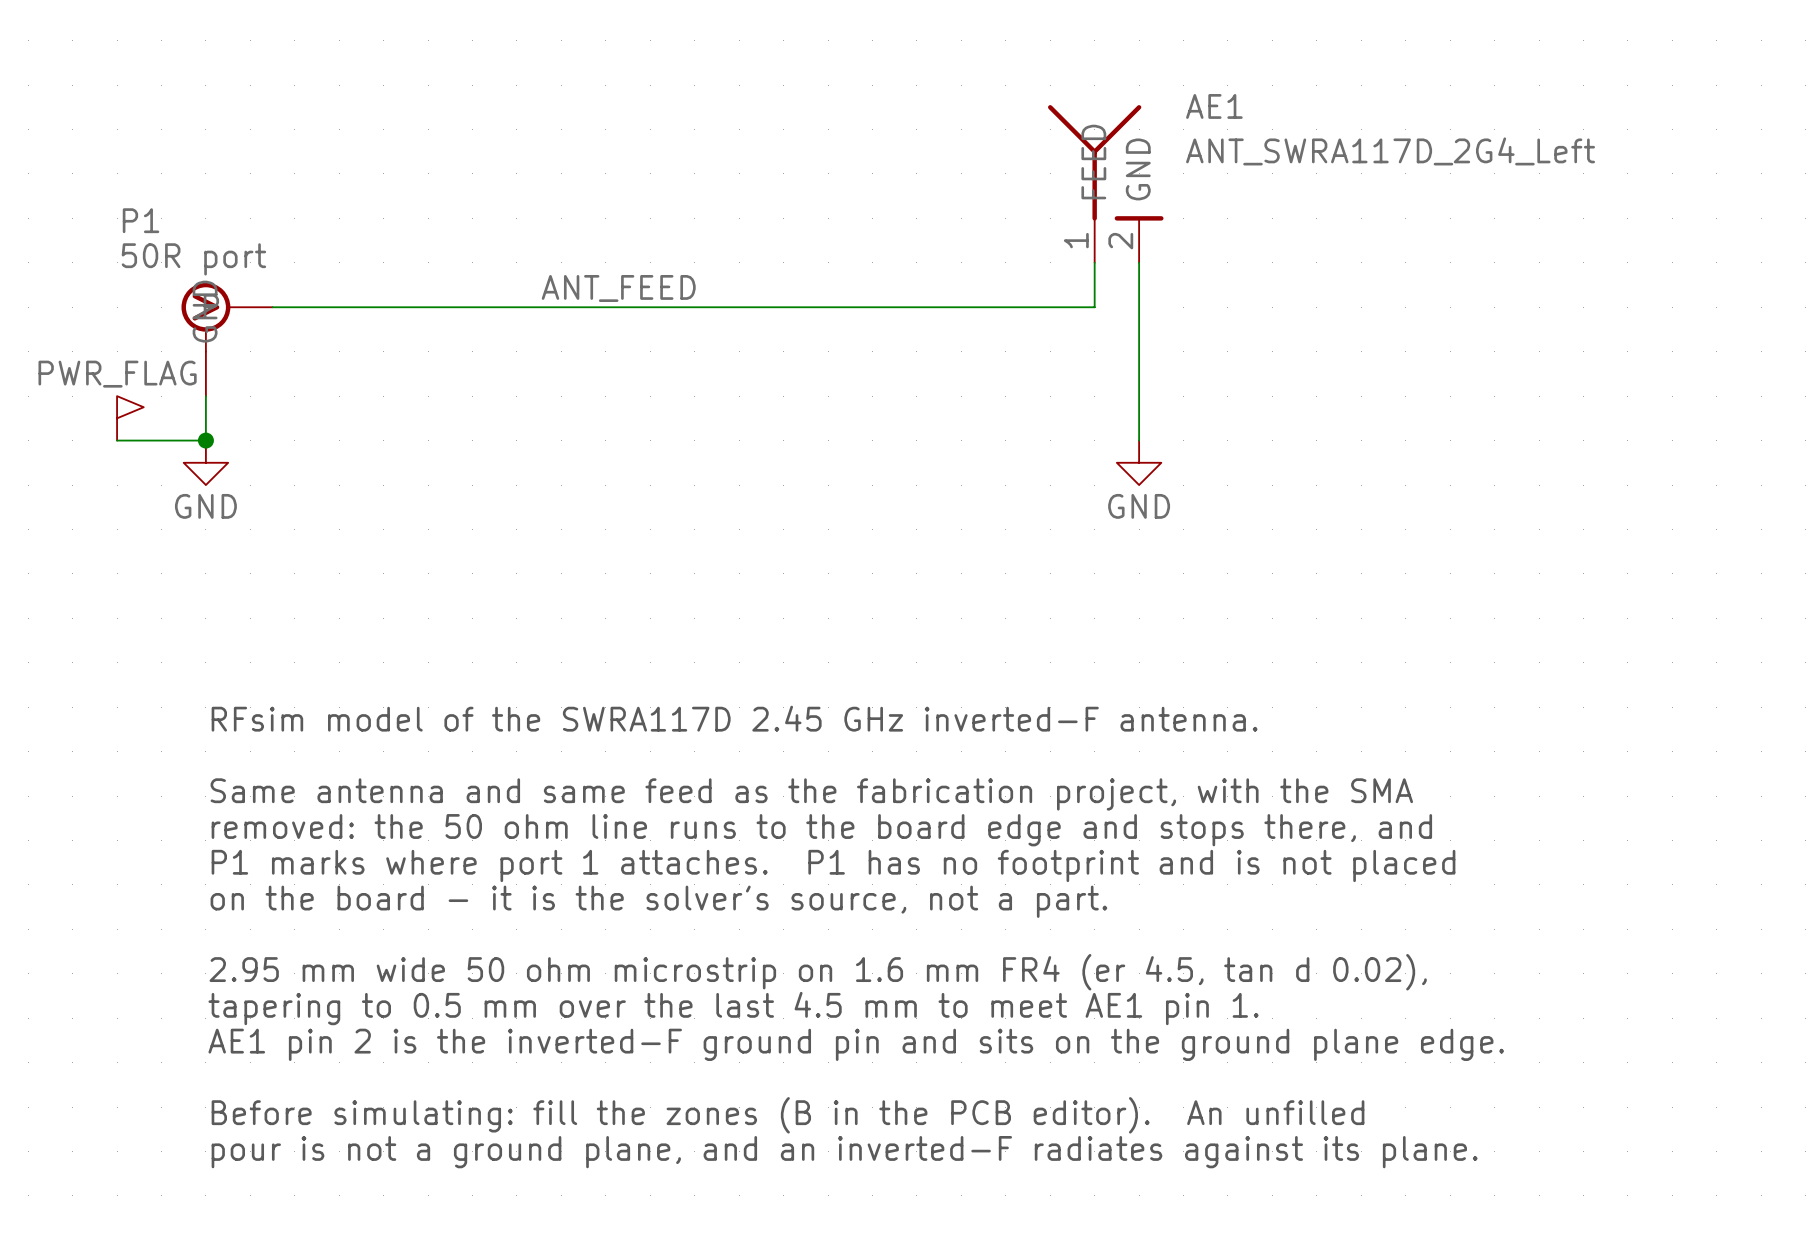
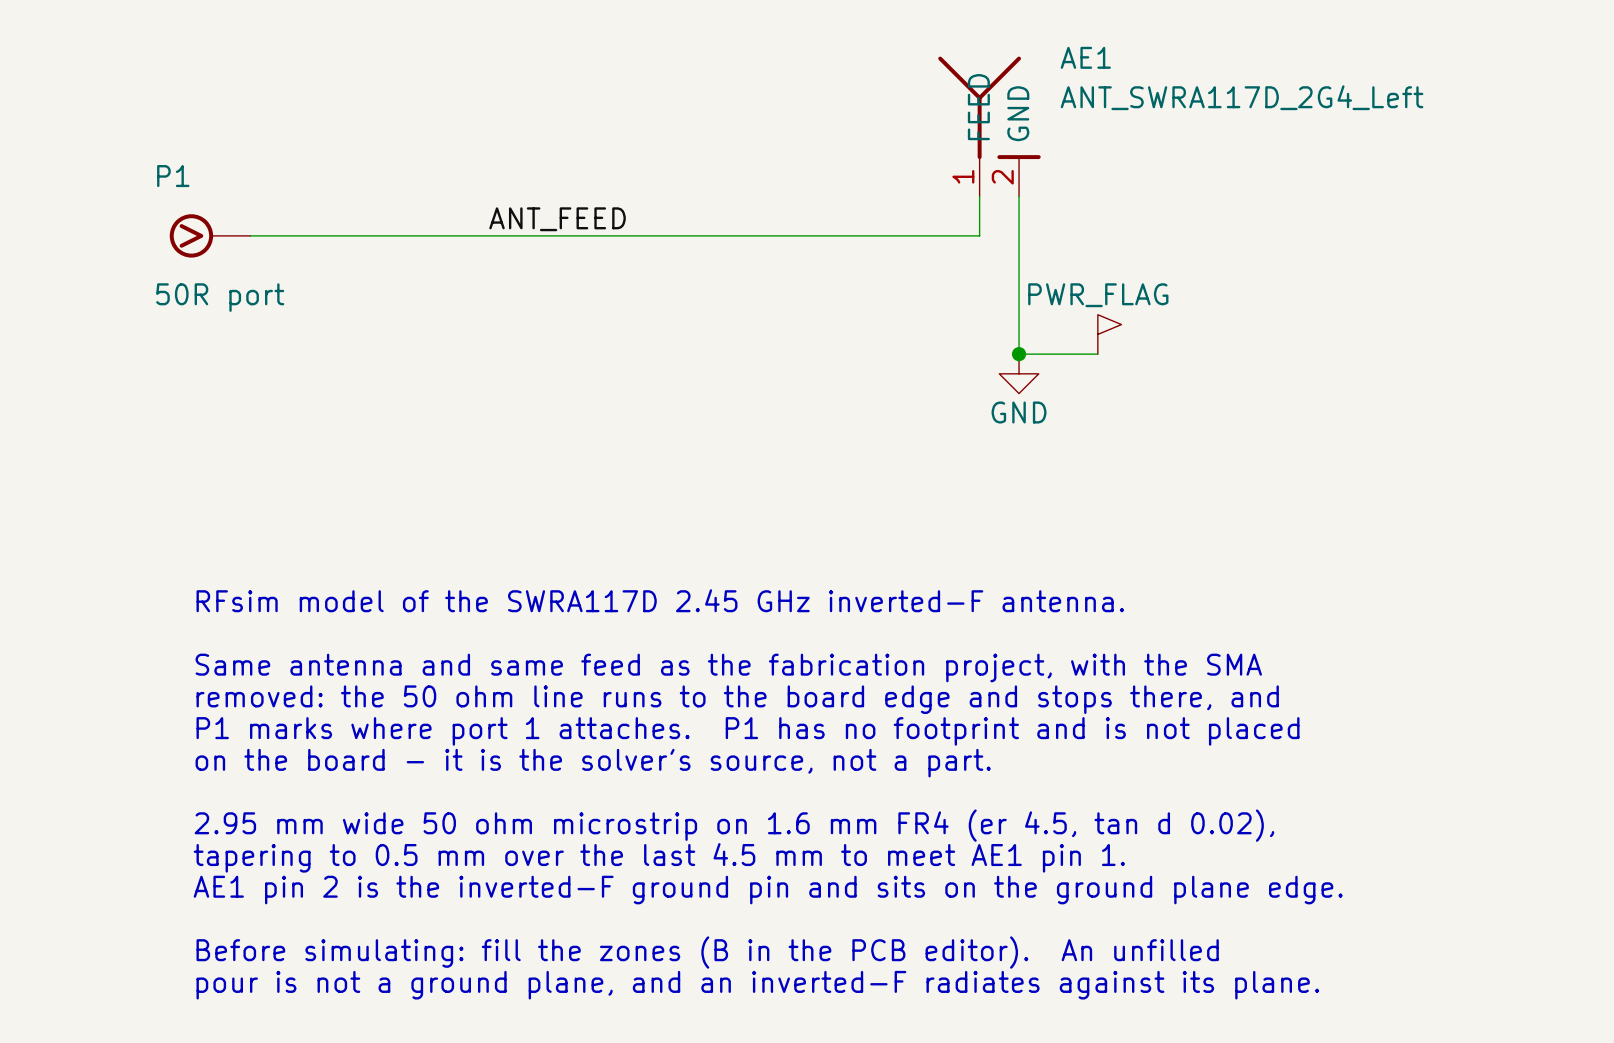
P1 name position: P1 (141, 220) -> P1 (173, 176)
P1 value position: 50R port (193, 259) -> 50R port (220, 297)
P1 symbol: [181, 282, 273, 397] -> [169, 214, 251, 258]
wire: (205, 396) (205, 440) (117, 440) -> none
power symbol: PWR_FLAG (130, 418) -> none
power symbol: none -> PWR_FLAG (1109, 334)
junction: (205, 440) -> none
wire: none -> (1019, 354) (1097, 354)
junction: none -> (1019, 354)
power symbol: GND (205, 462) -> none

